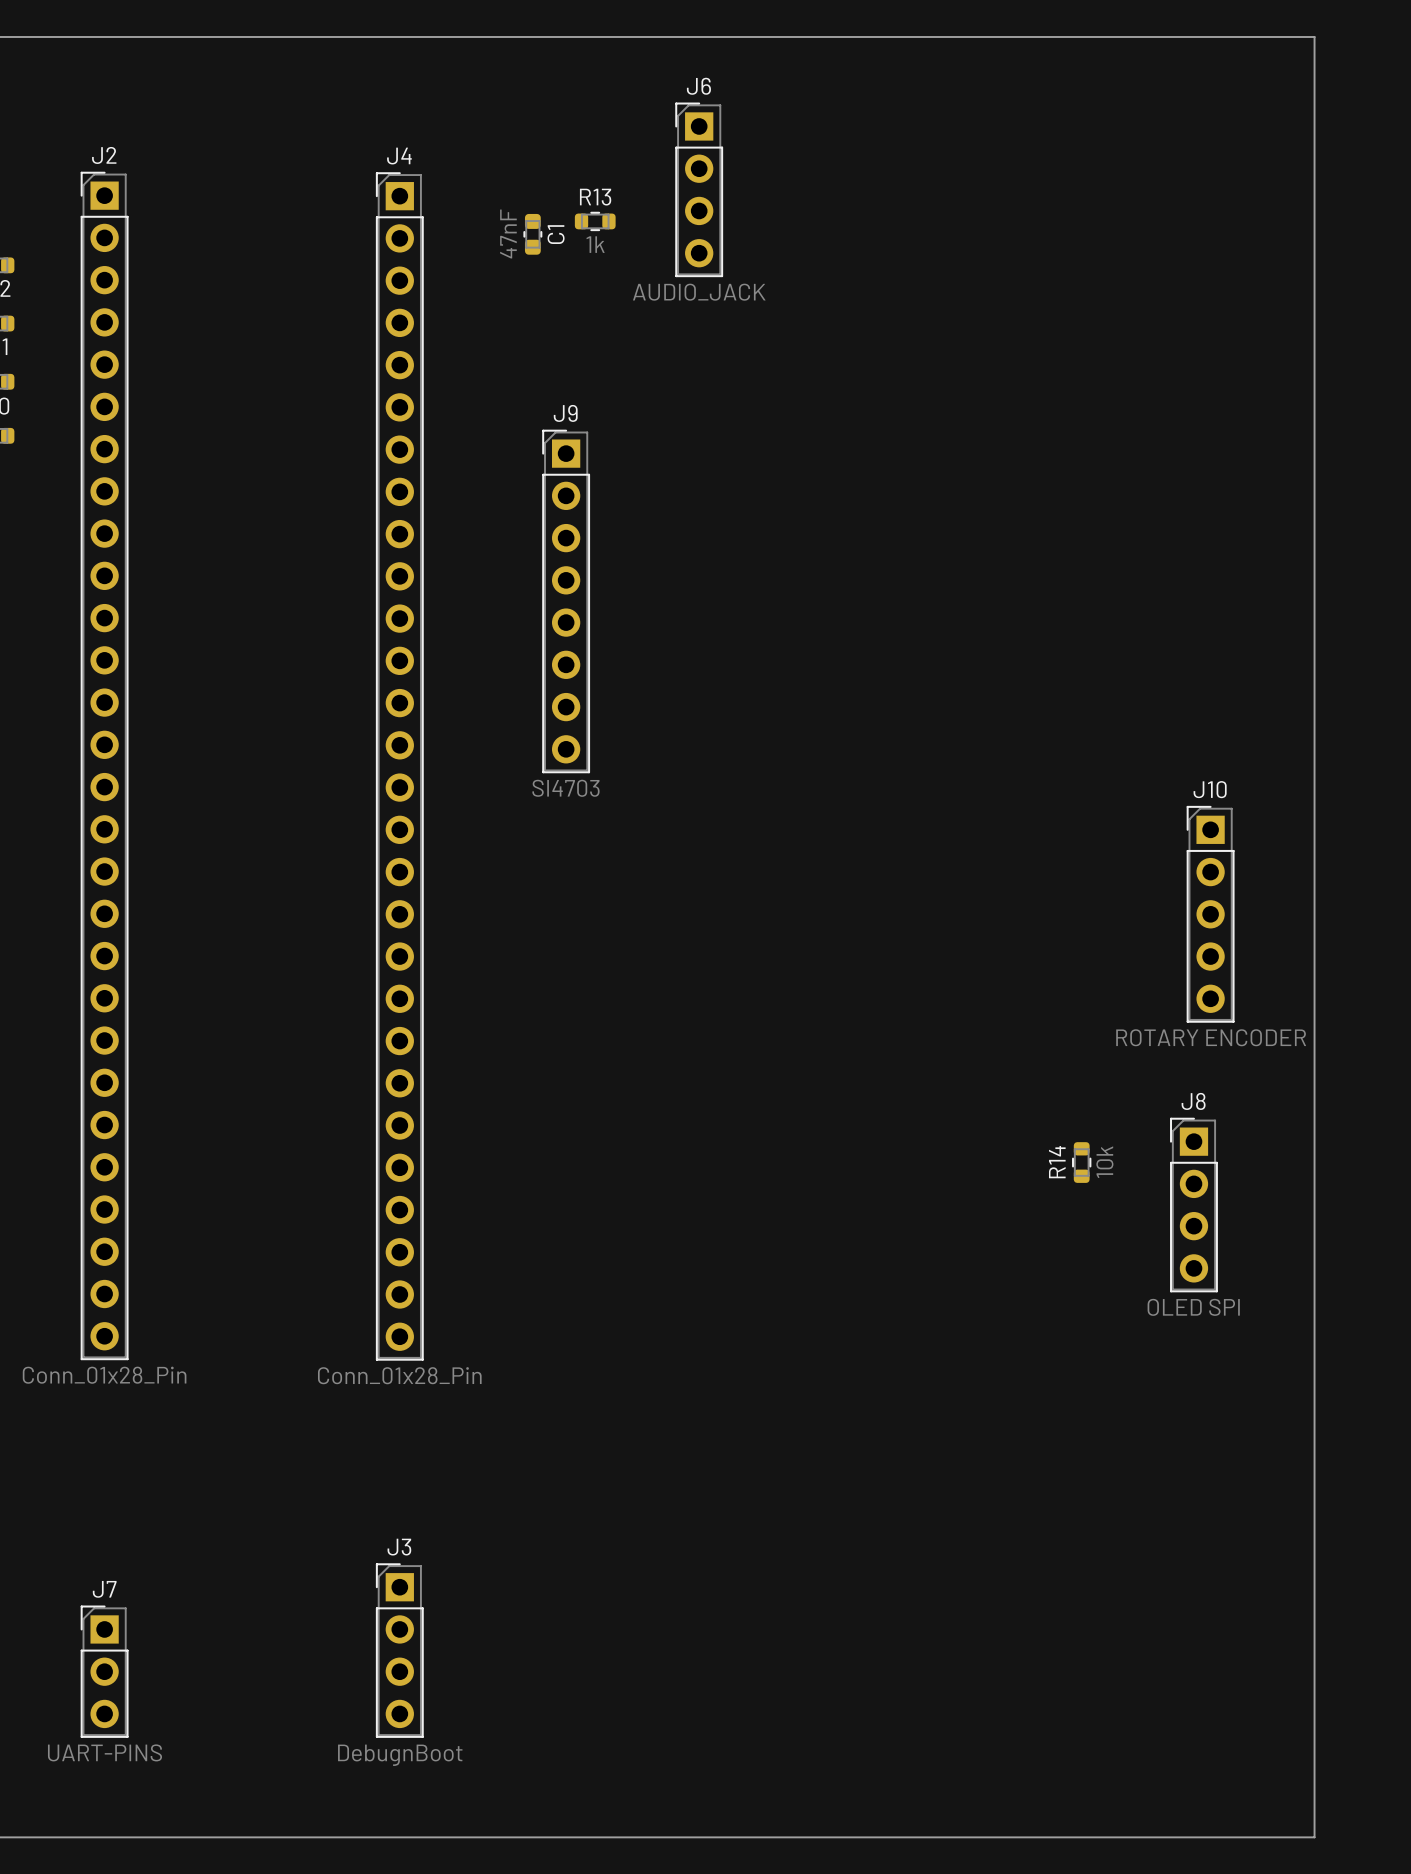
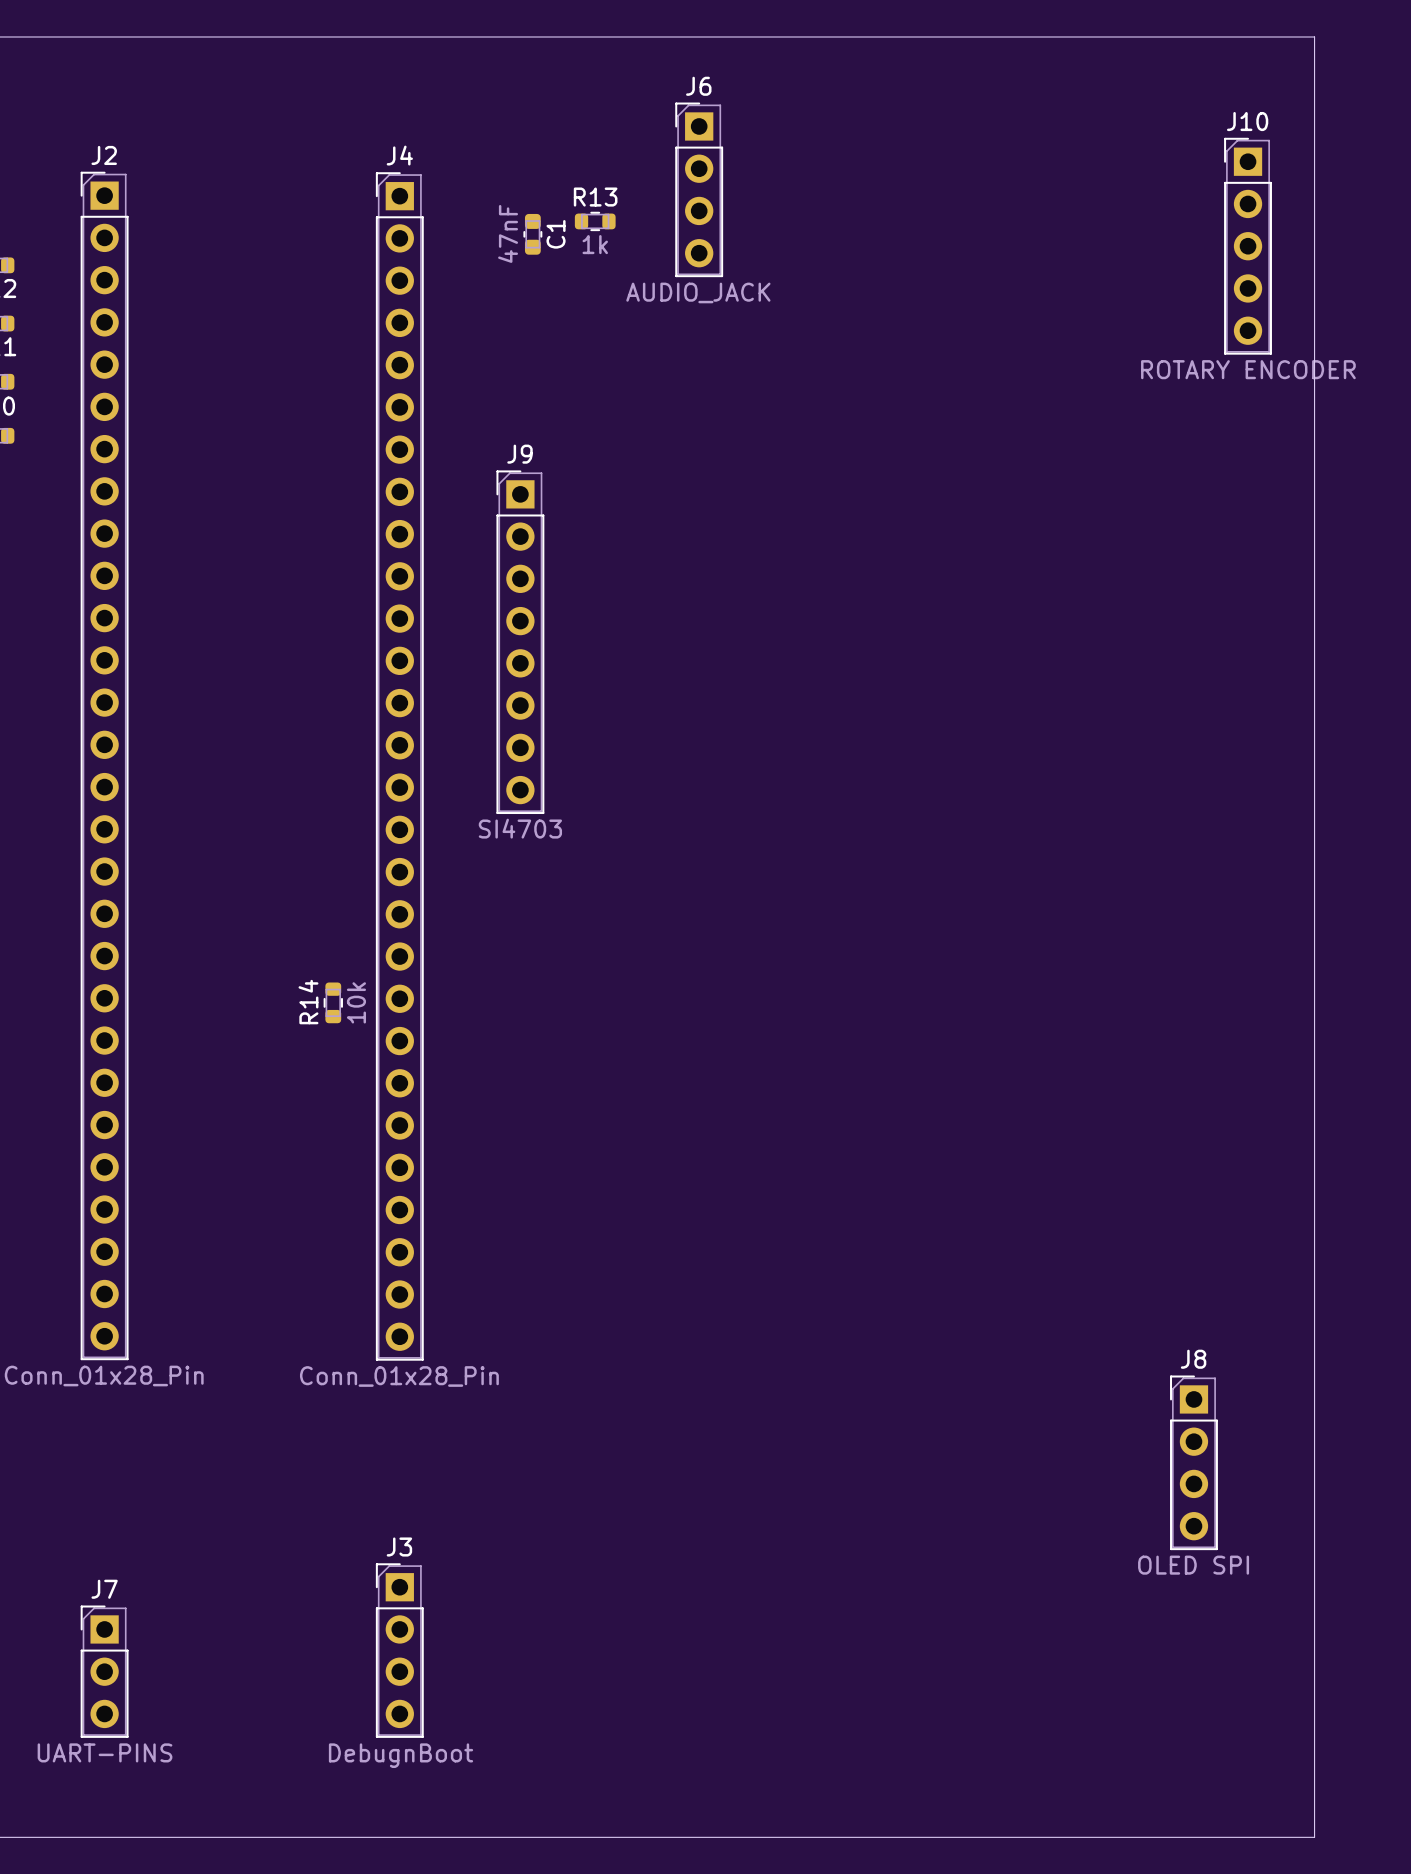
J9 position: (566, 601) -> (520, 642)
J10 position: (1210, 914) -> (1248, 246)
R14 position: (1081, 1162) -> (333, 1002)
J8 position: (1193, 1205) -> (1193, 1462)

